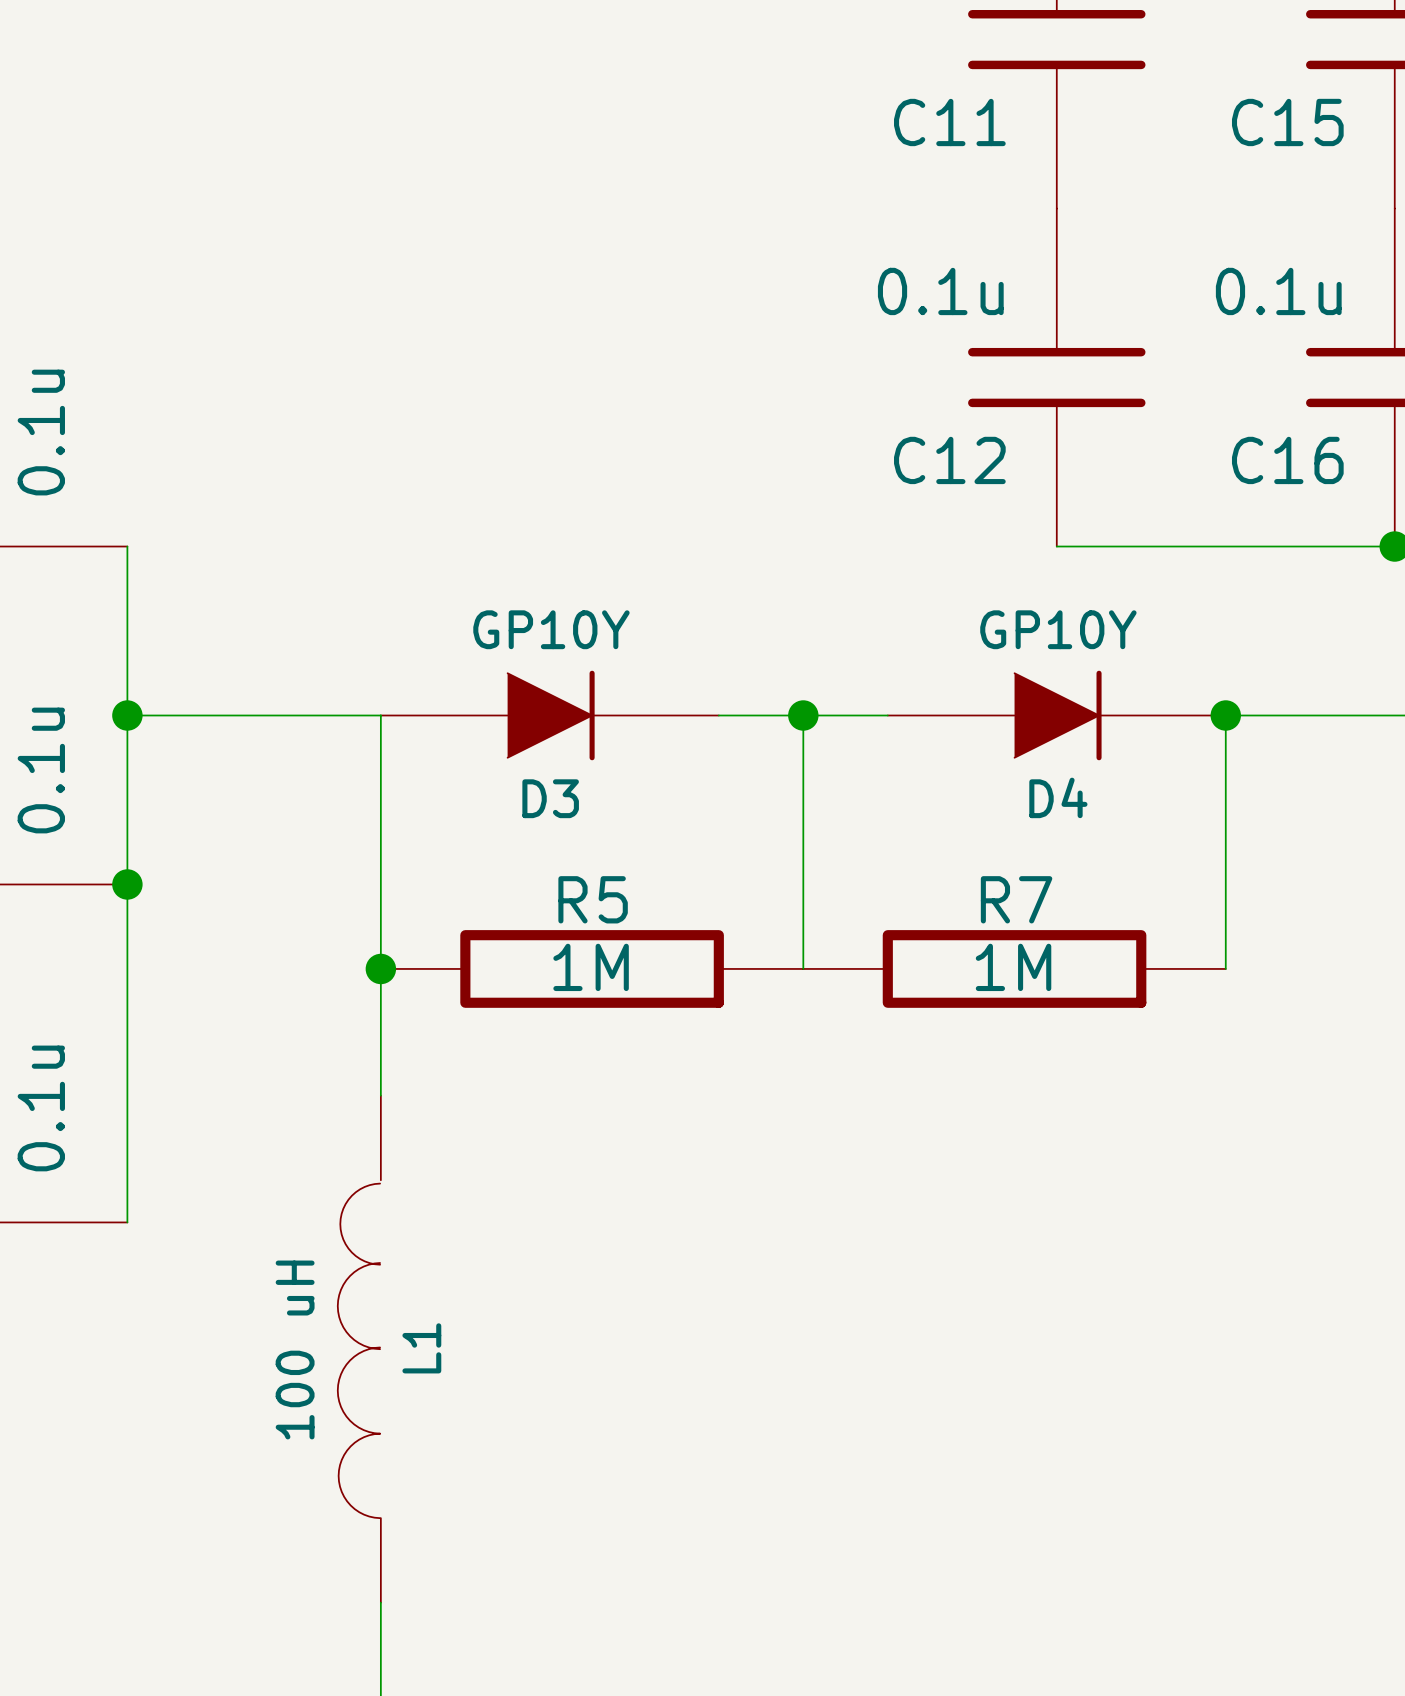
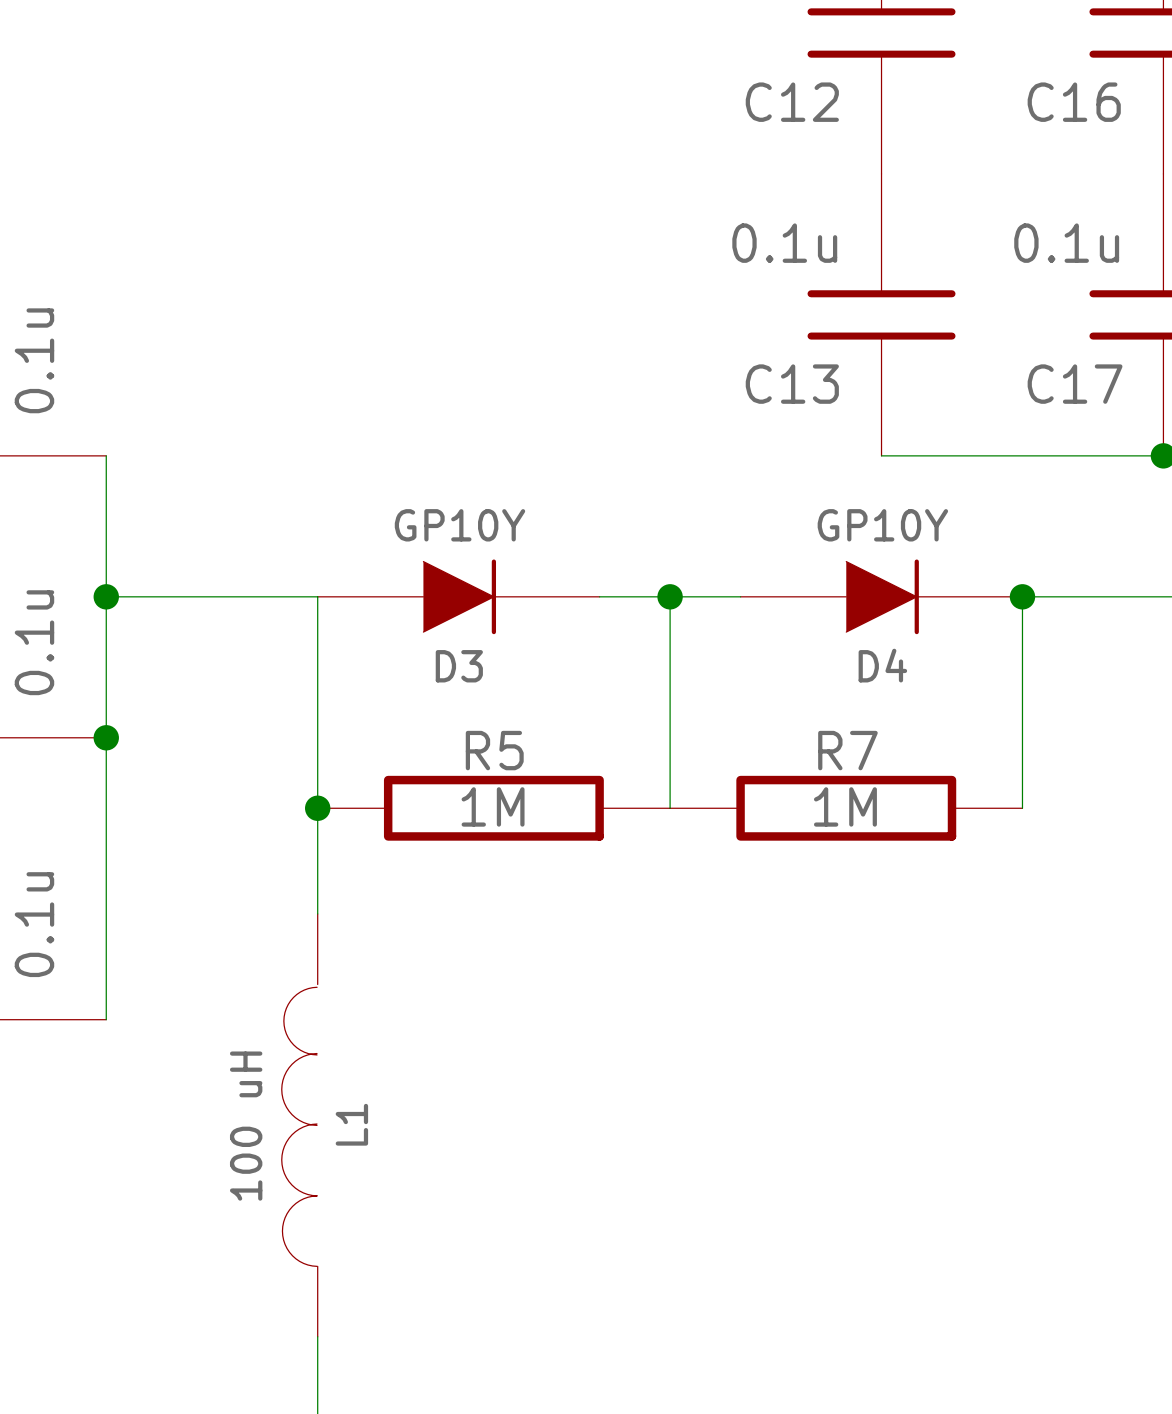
C11 name: C11 (949, 122) -> C12 (792, 102)
C15 name: C15 (1287, 122) -> C16 (1074, 102)
C12 name: C12 (949, 460) -> C13 (792, 384)
C16 name: C16 (1287, 460) -> C17 (1075, 384)

